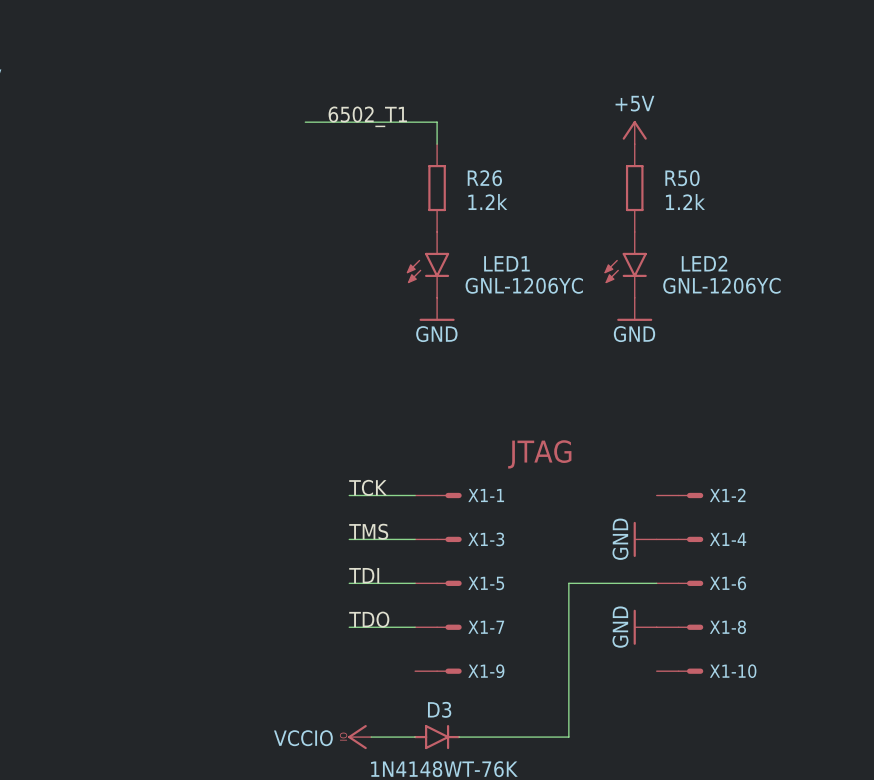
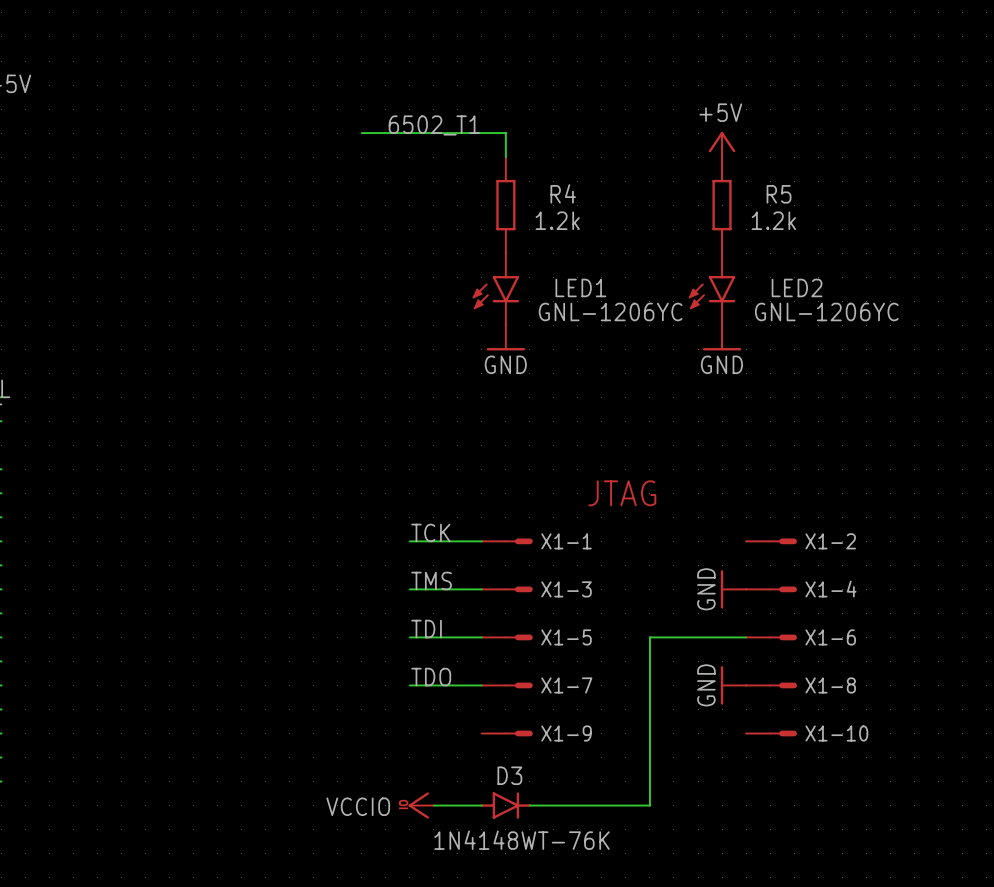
R26 name: R26 (484, 178) -> R4 (563, 193)
R50 name: R50 (682, 178) -> R5 (779, 194)

